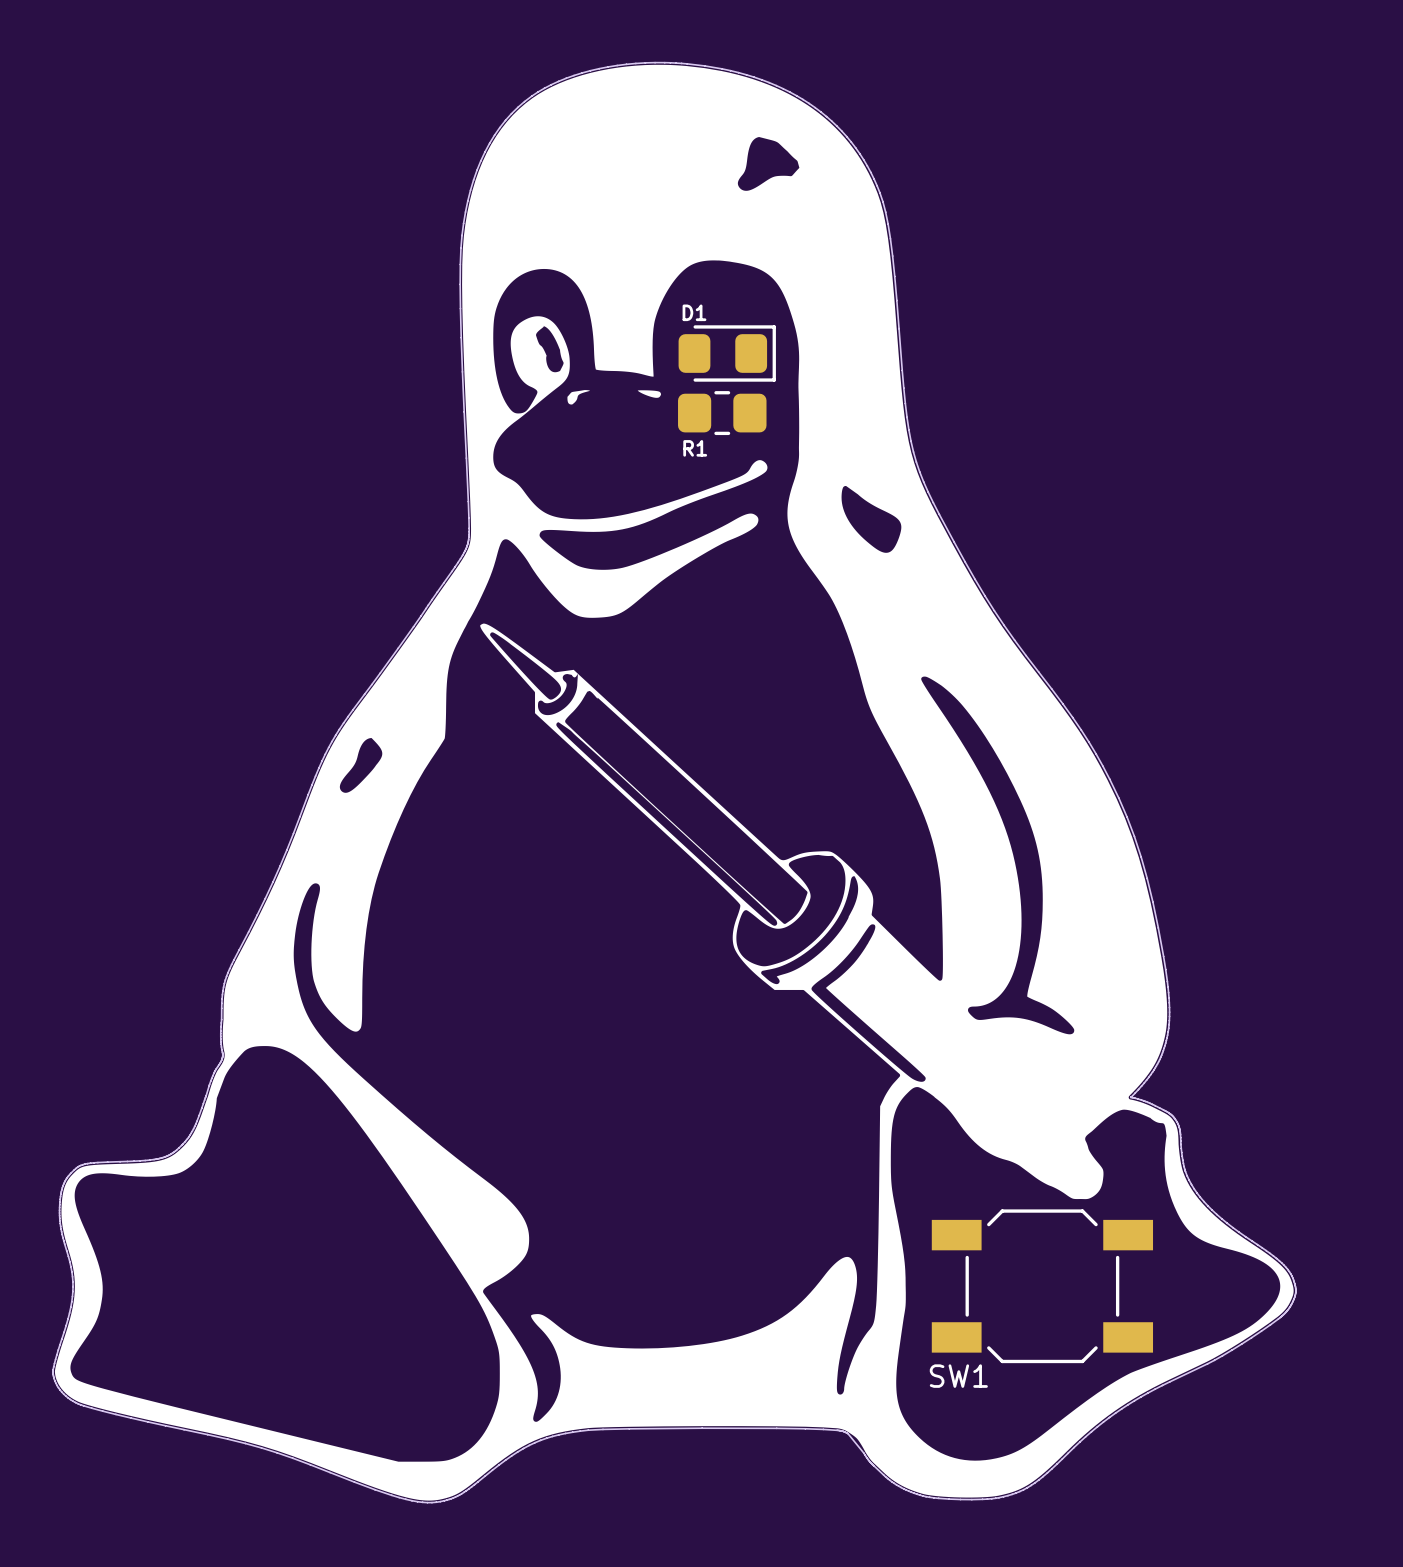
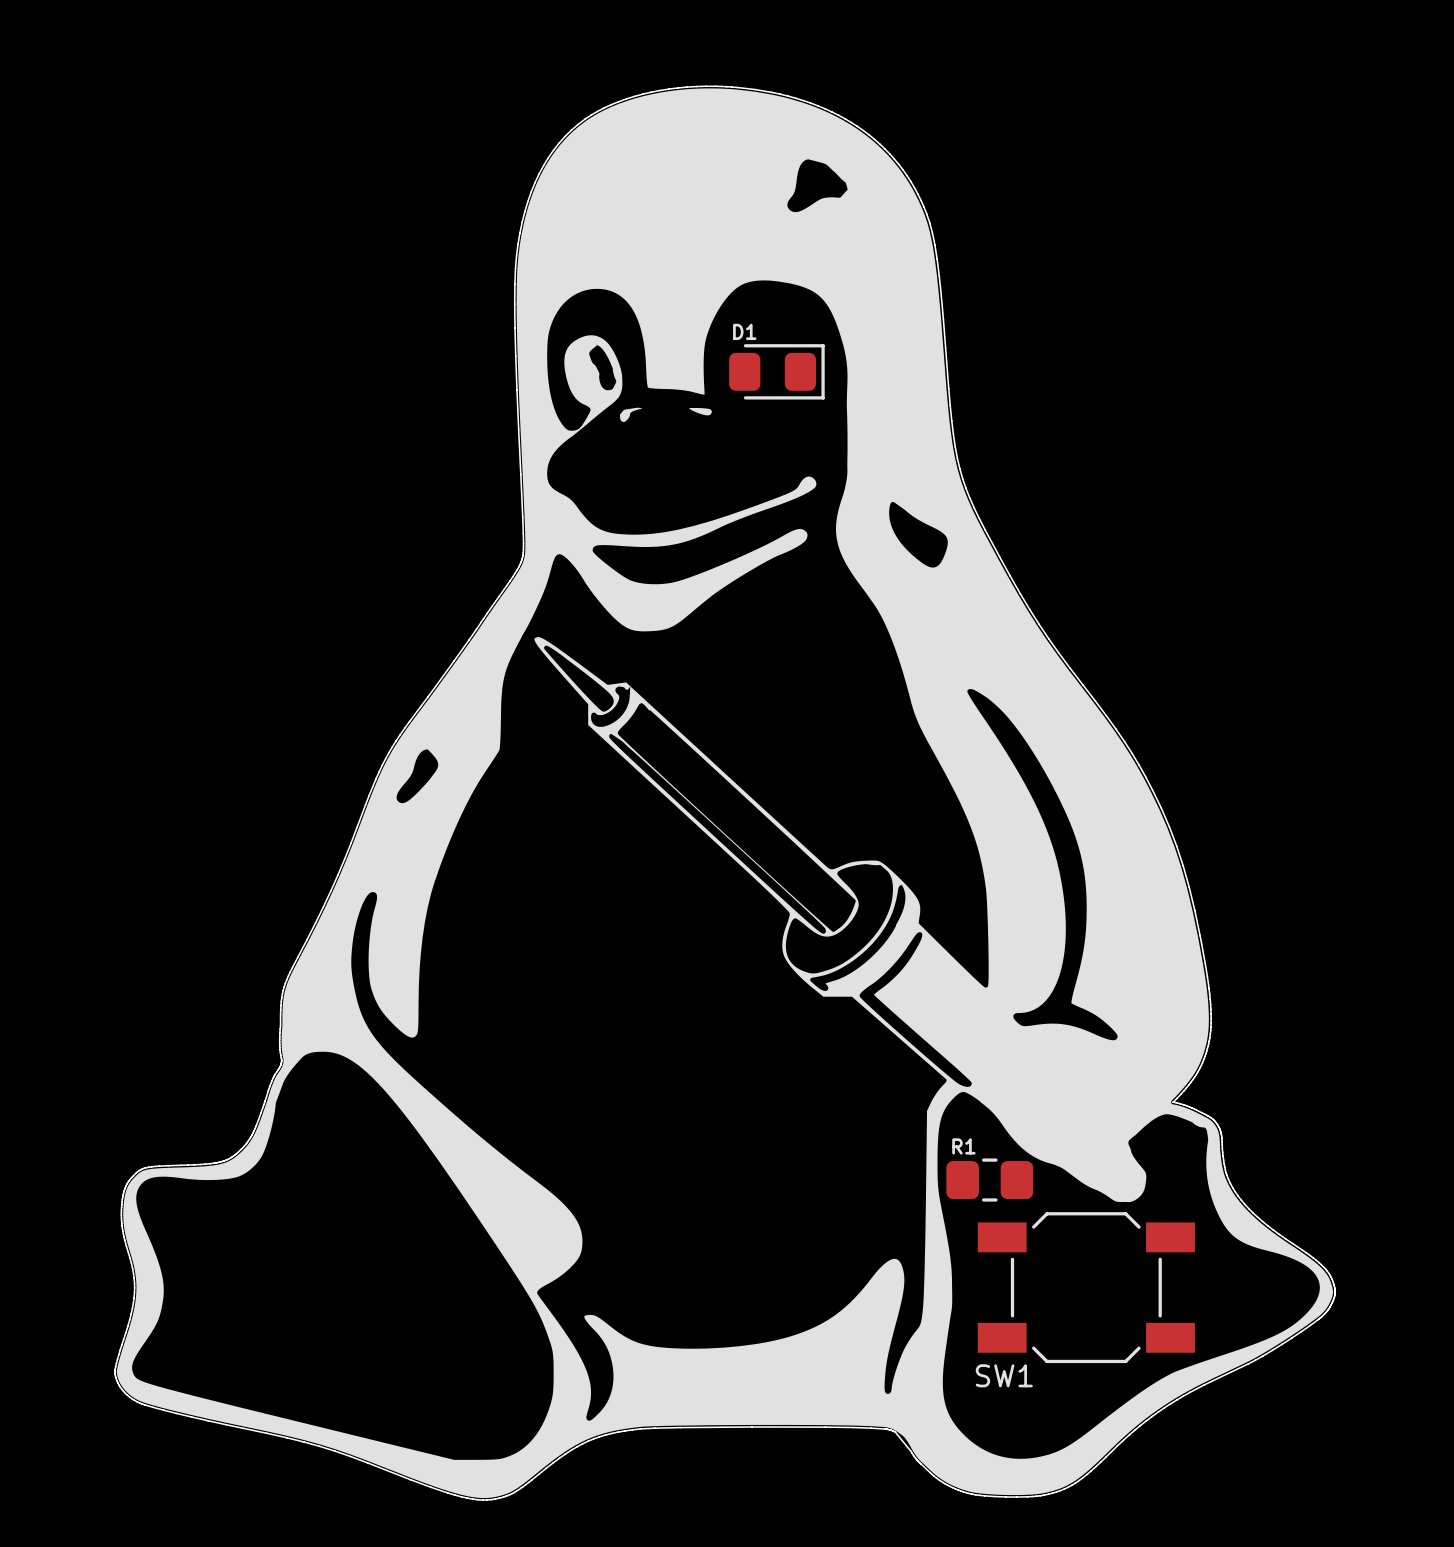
R1 position: (722, 413) -> (989, 1180)
R1 name position: R1 (695, 448) -> R1 (963, 1146)

